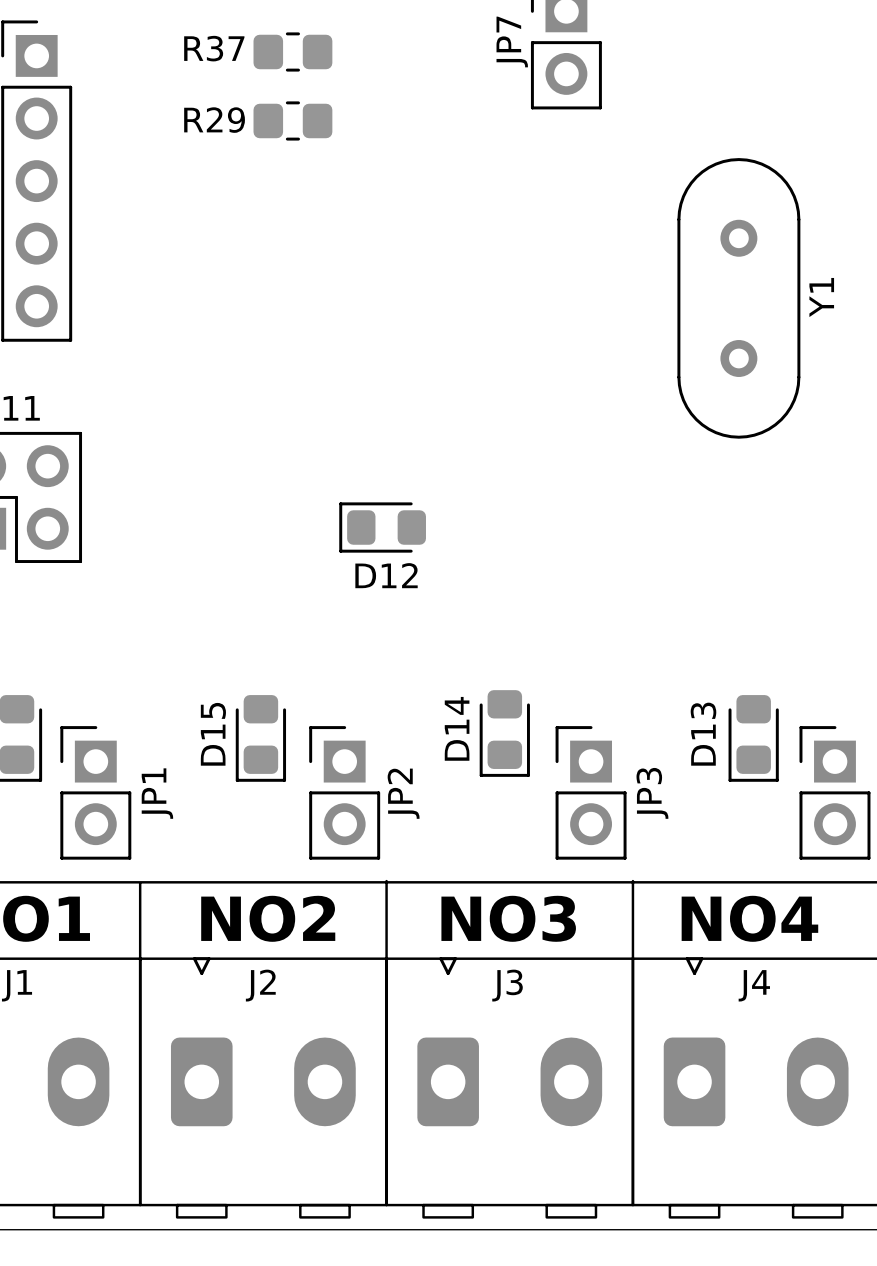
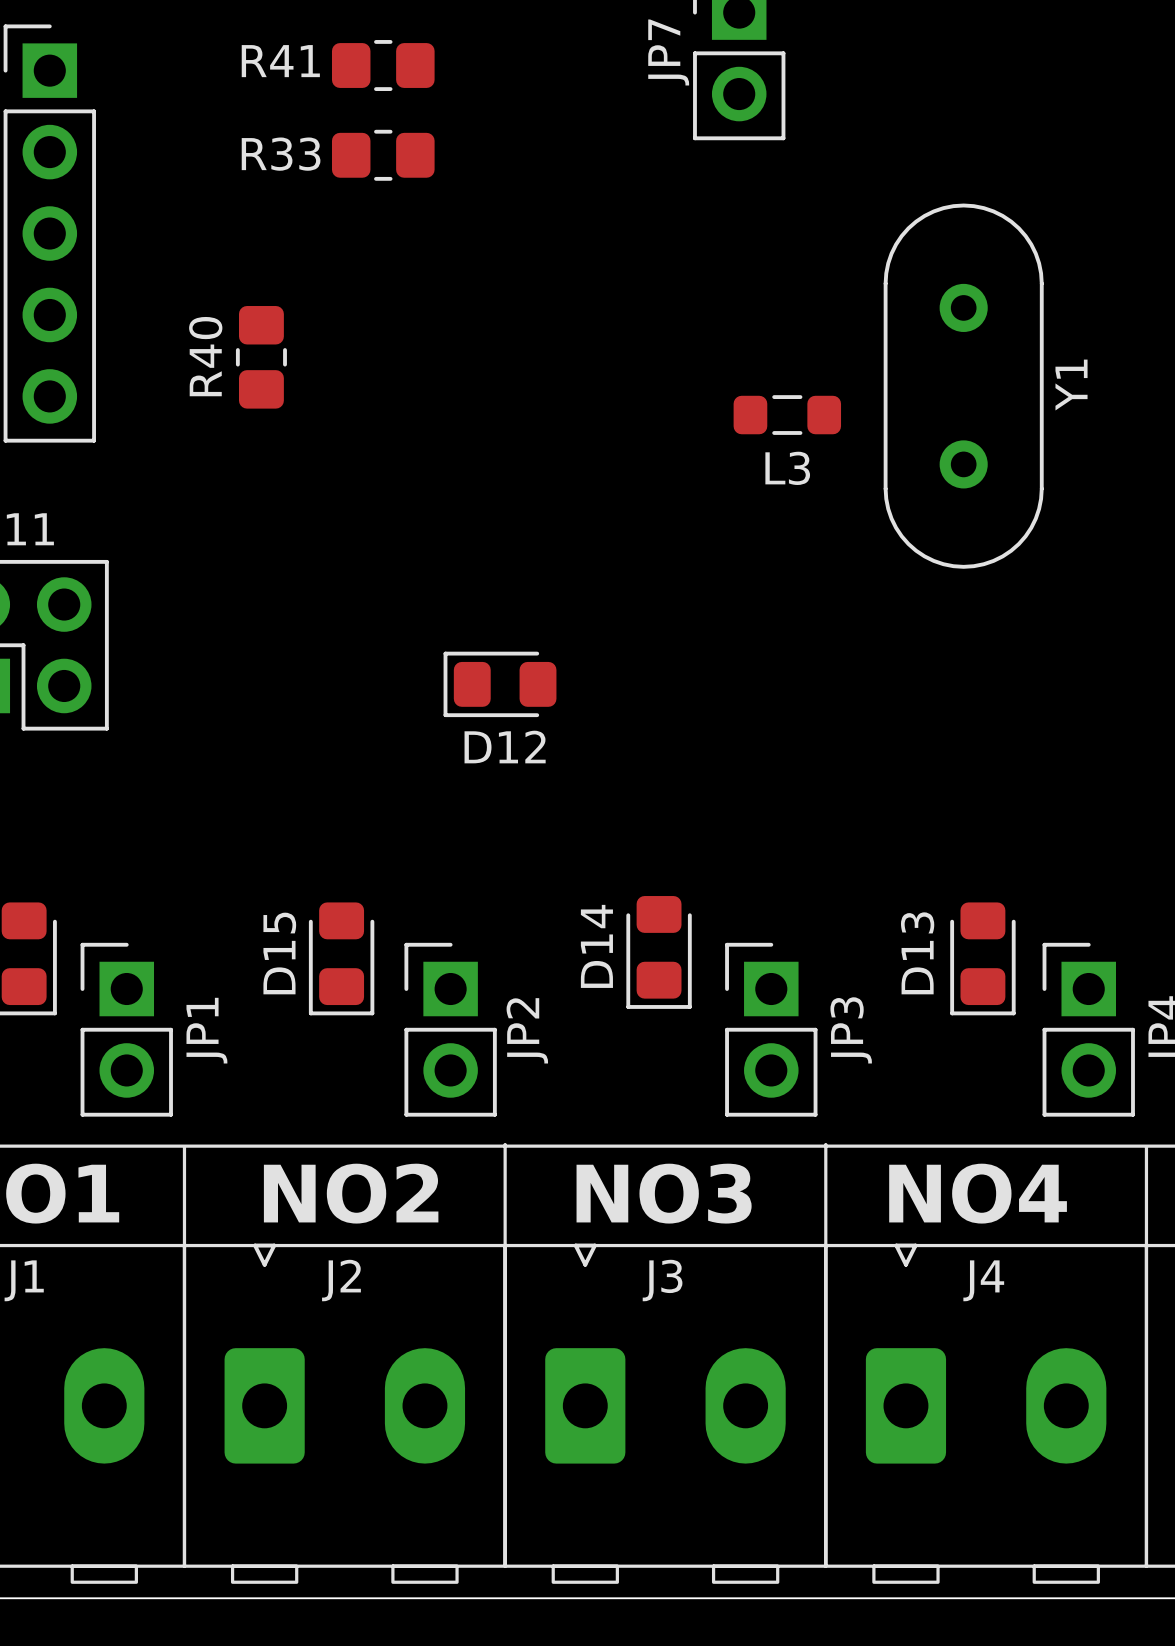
R37 name: R37 (214, 48) -> R41 (280, 61)
R29 name: R29 (214, 120) -> R33 (281, 154)
R40: none -> (261, 357)
L3: none -> (787, 415)

